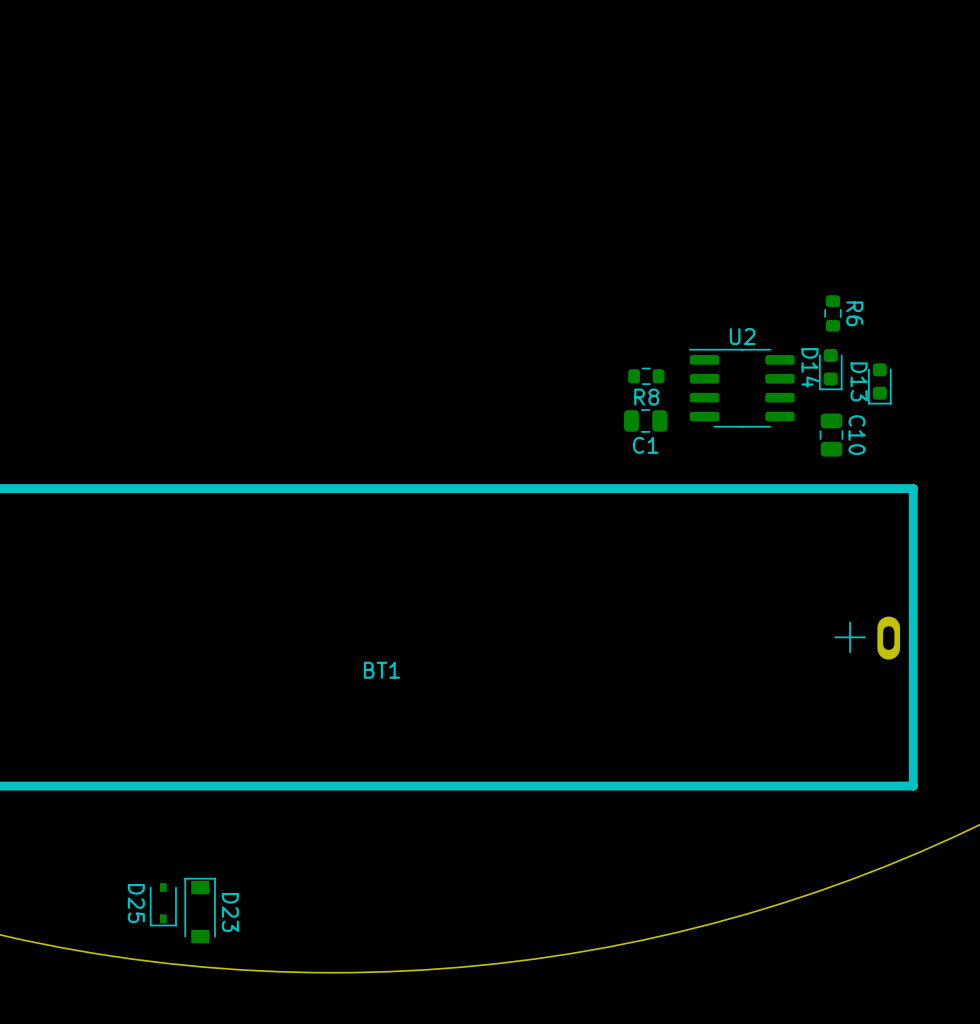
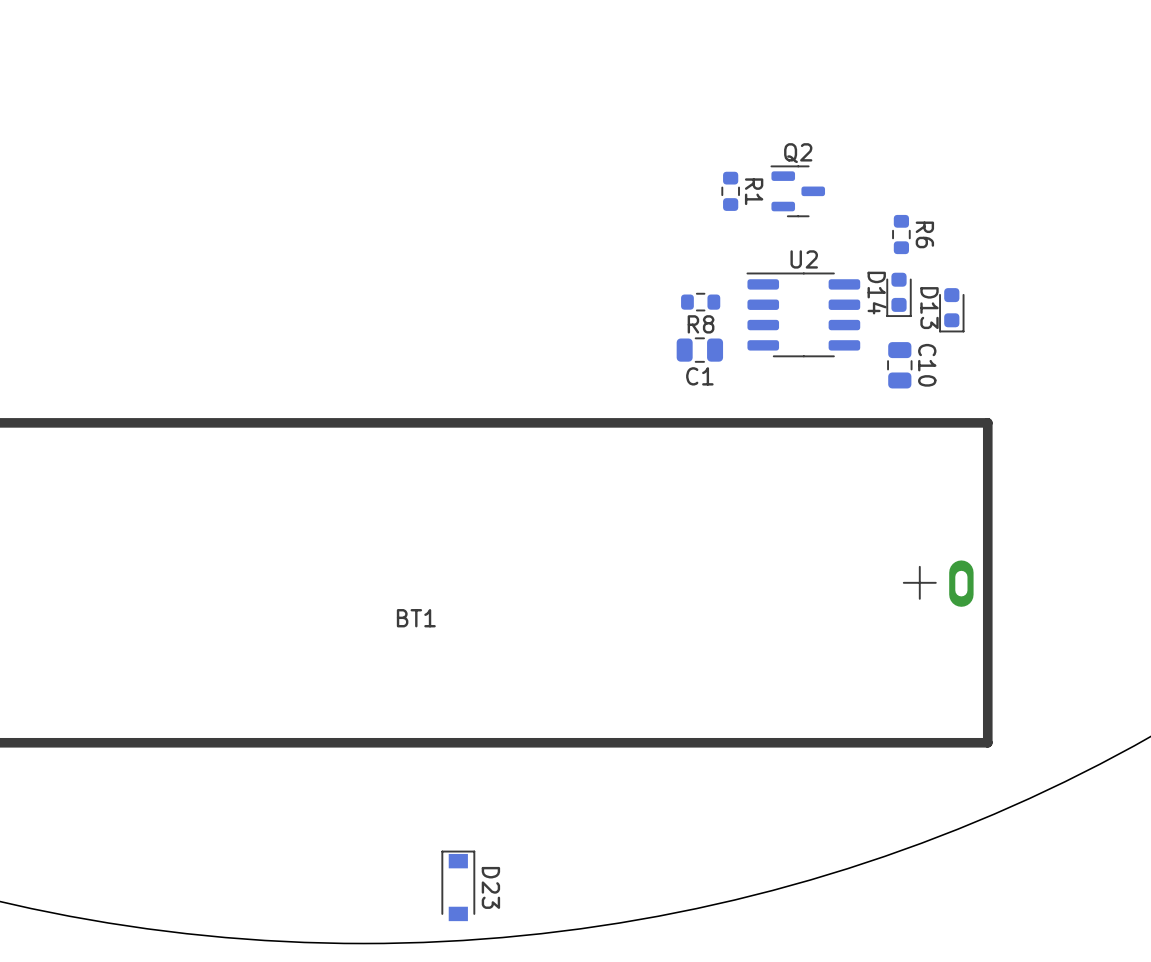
R1: none -> (730, 191)
Q2: none -> (797, 191)
D25: (163, 904) -> none
D23 position: (200, 910) -> (458, 885)

